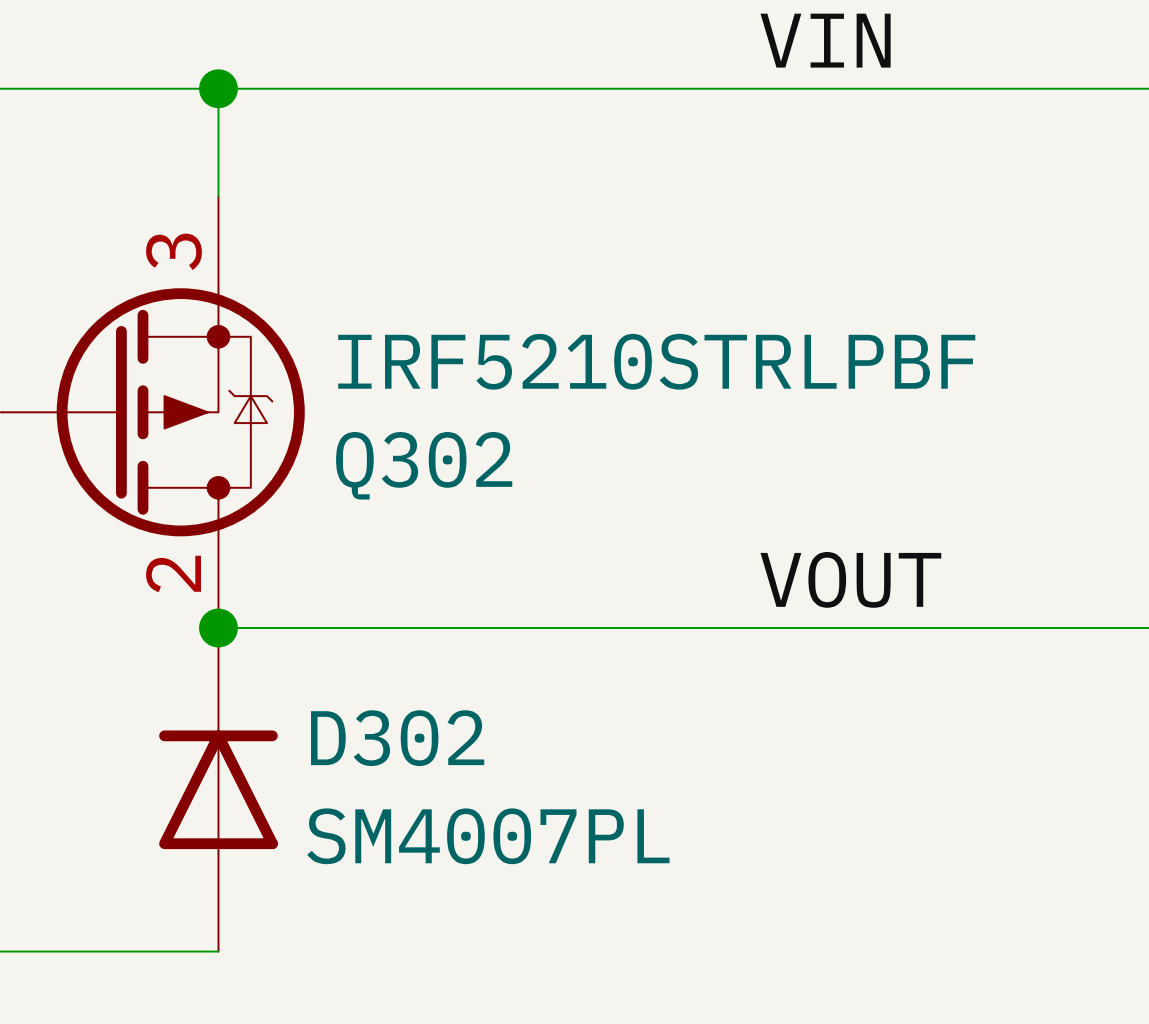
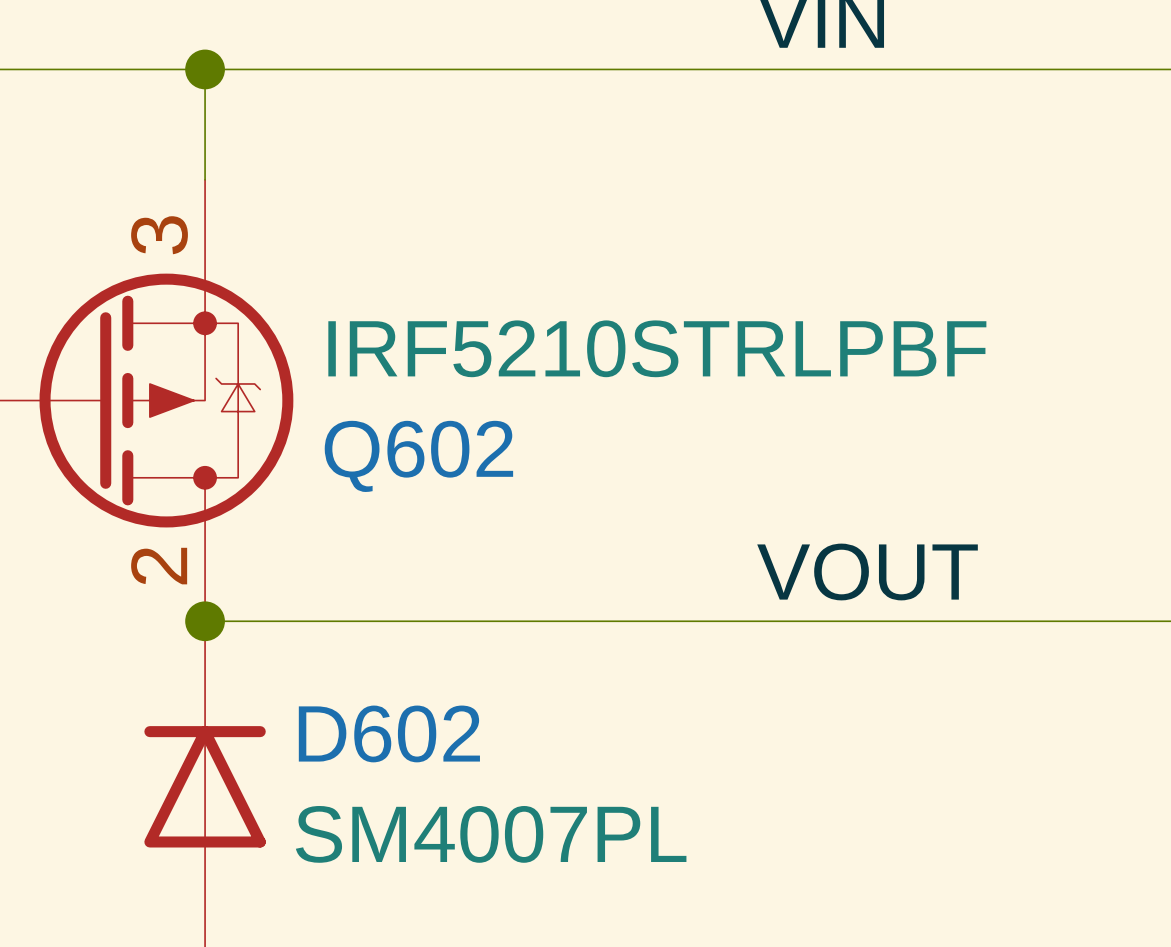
Q302 name: Q302 (424, 465) -> Q602 (418, 456)
D302 name: D302 (397, 738) -> D602 (389, 733)

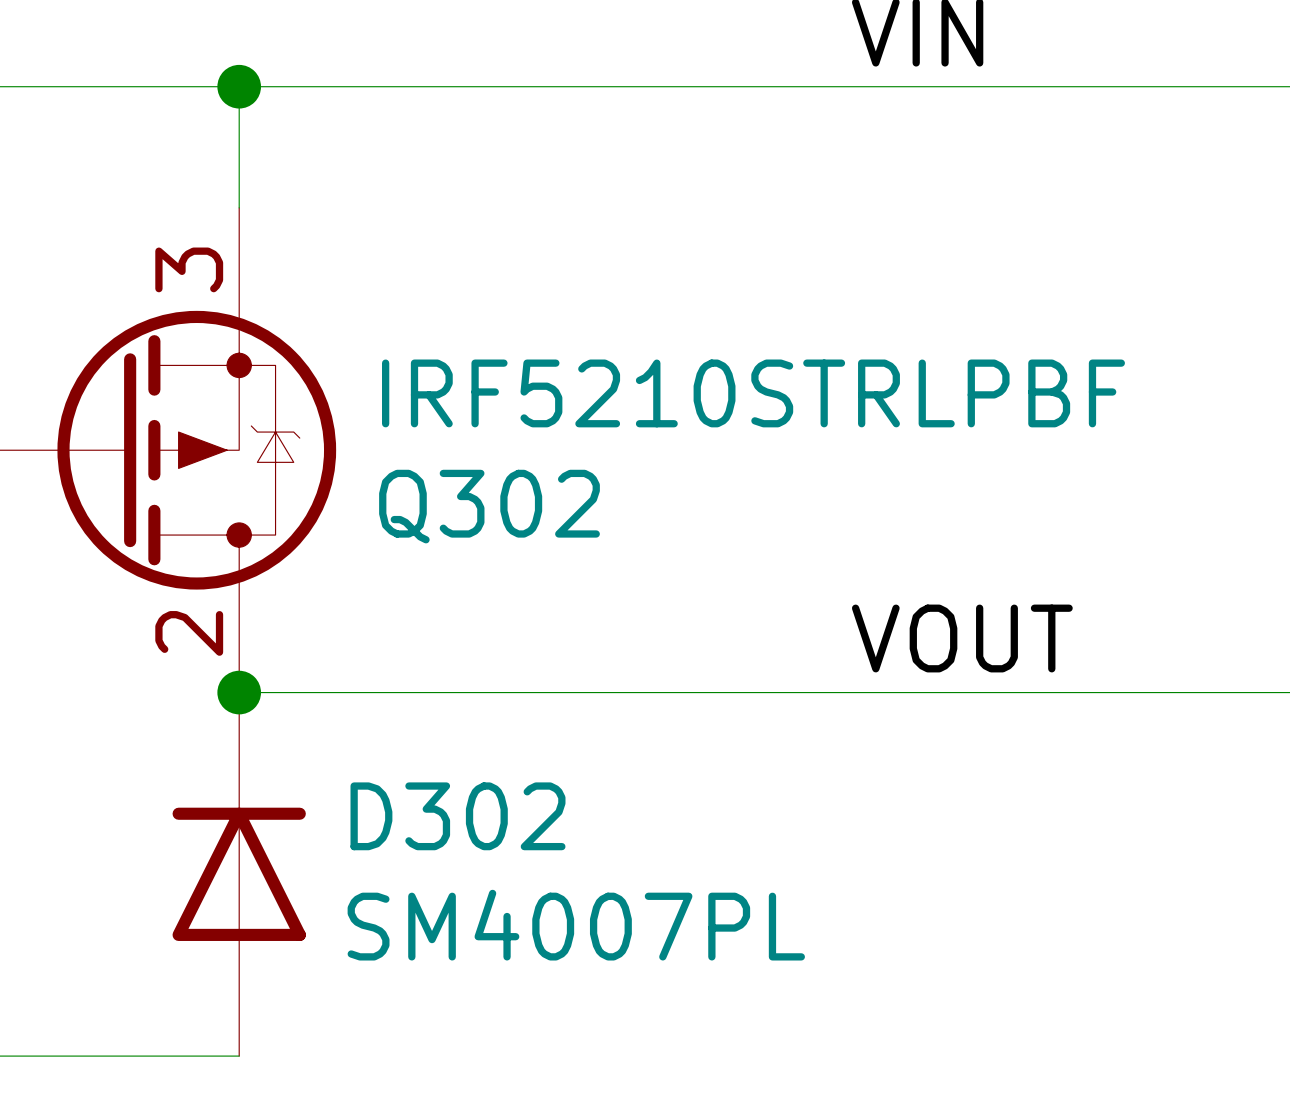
Q602 name: Q602 (418, 456) -> Q302 (489, 506)
D602 name: D602 (389, 733) -> D302 (457, 816)

